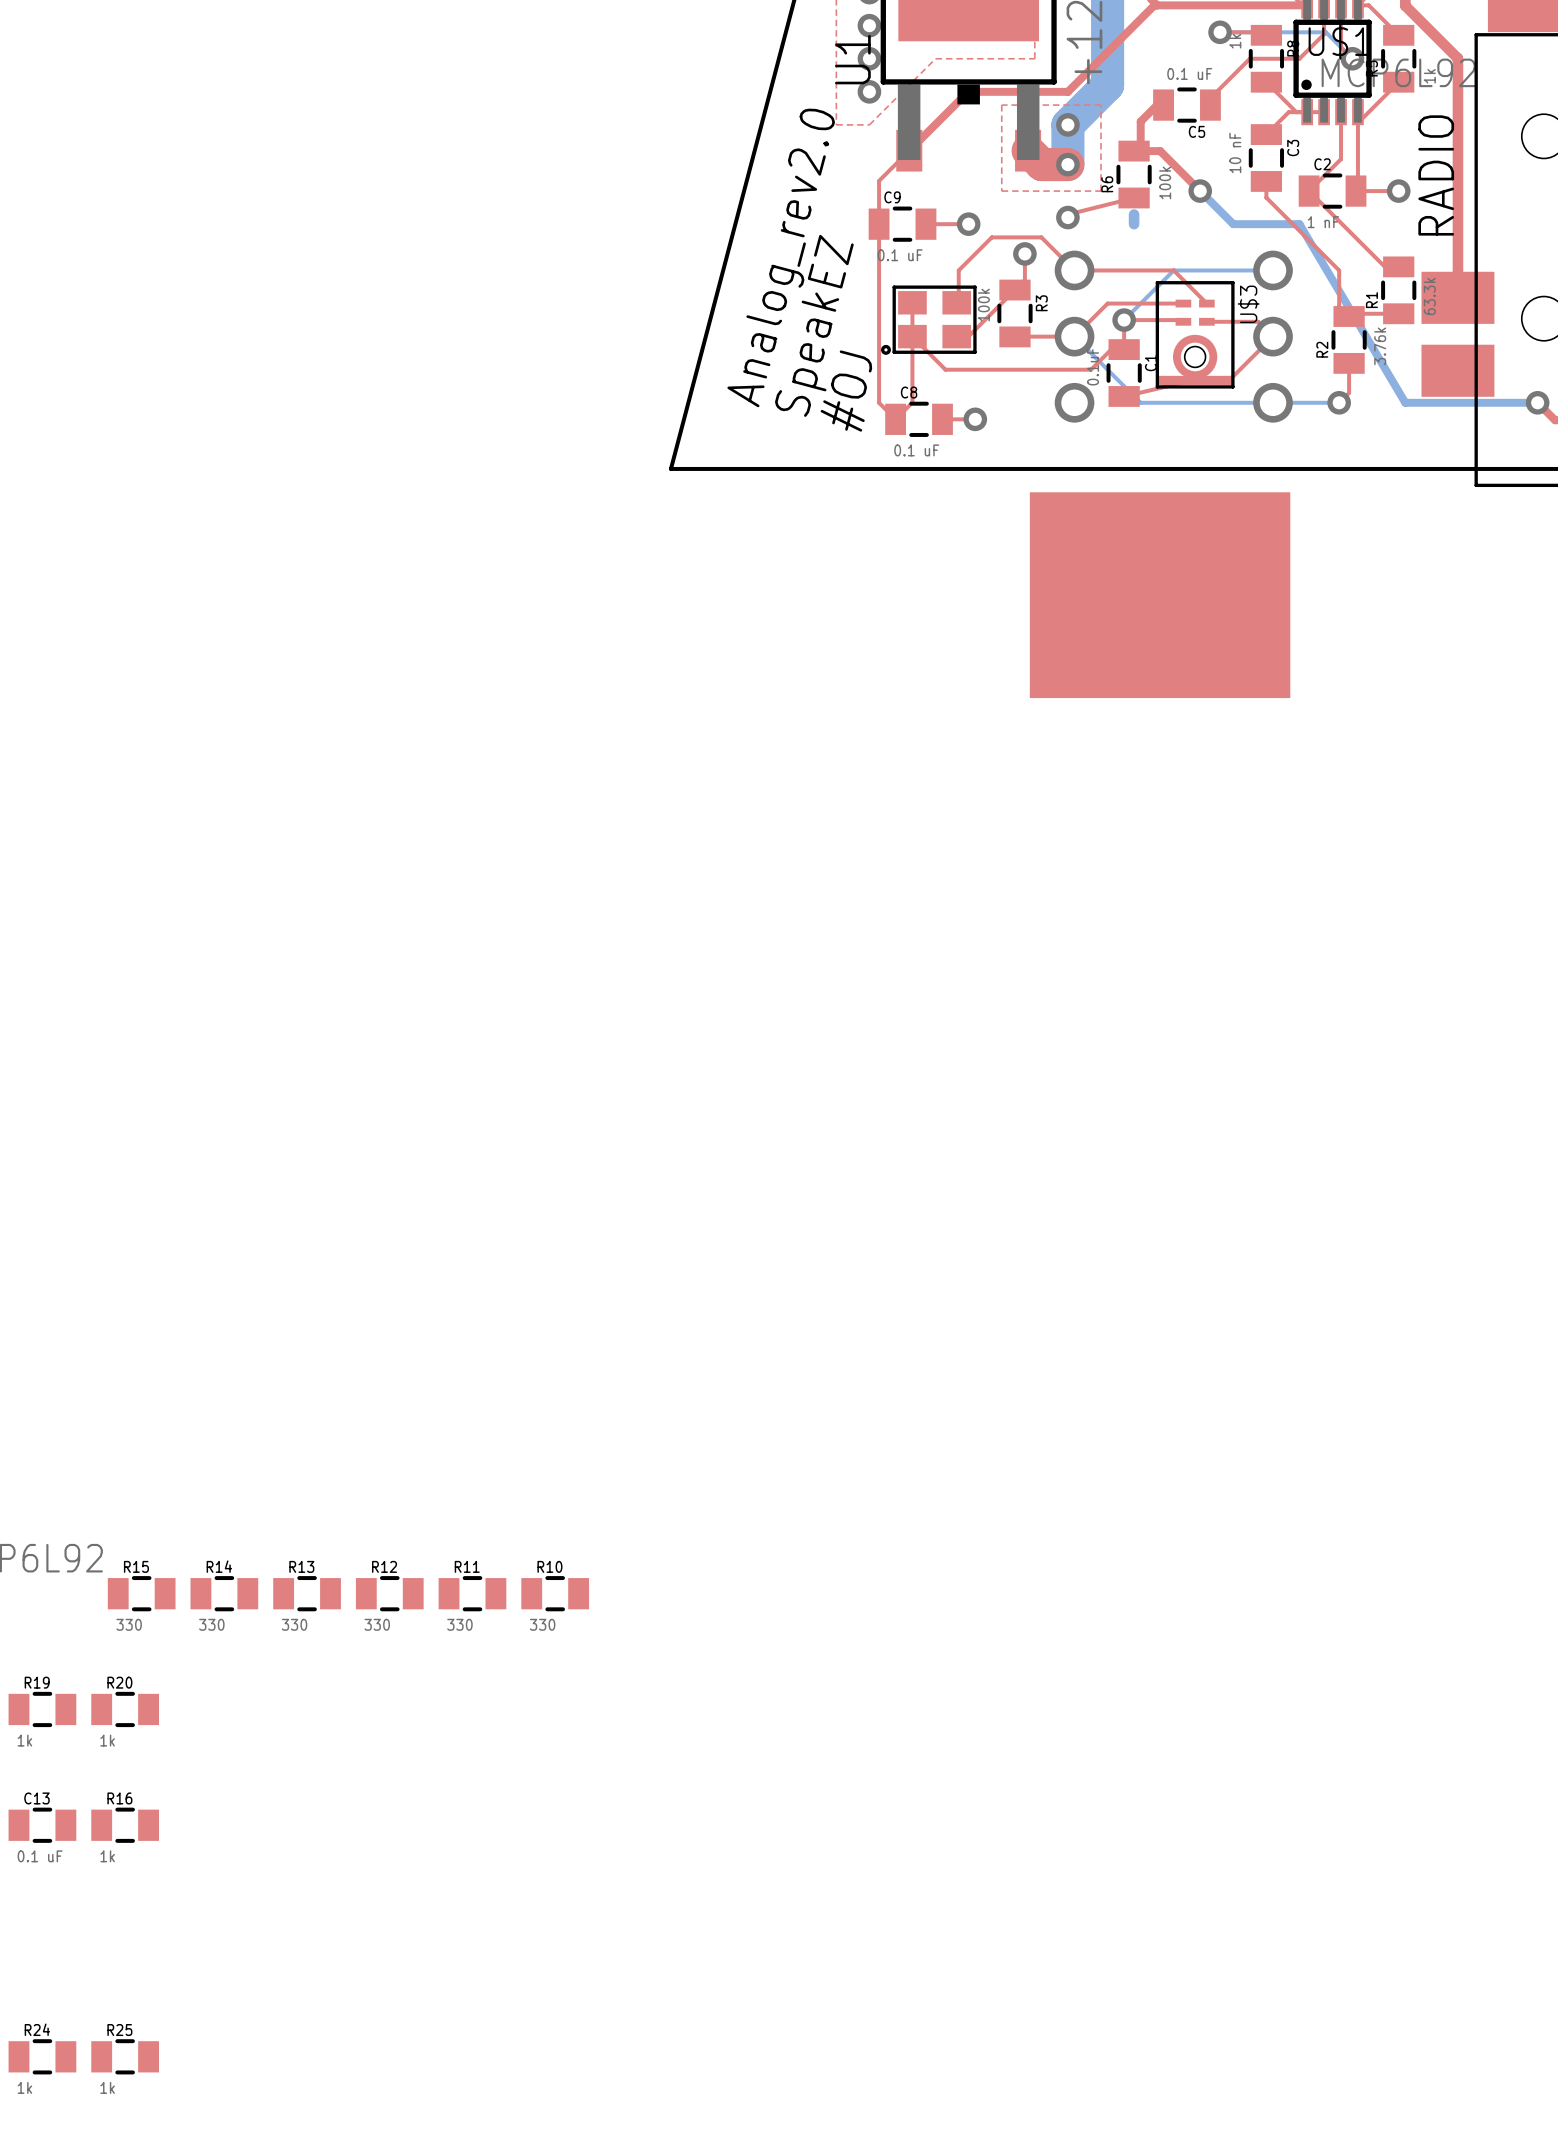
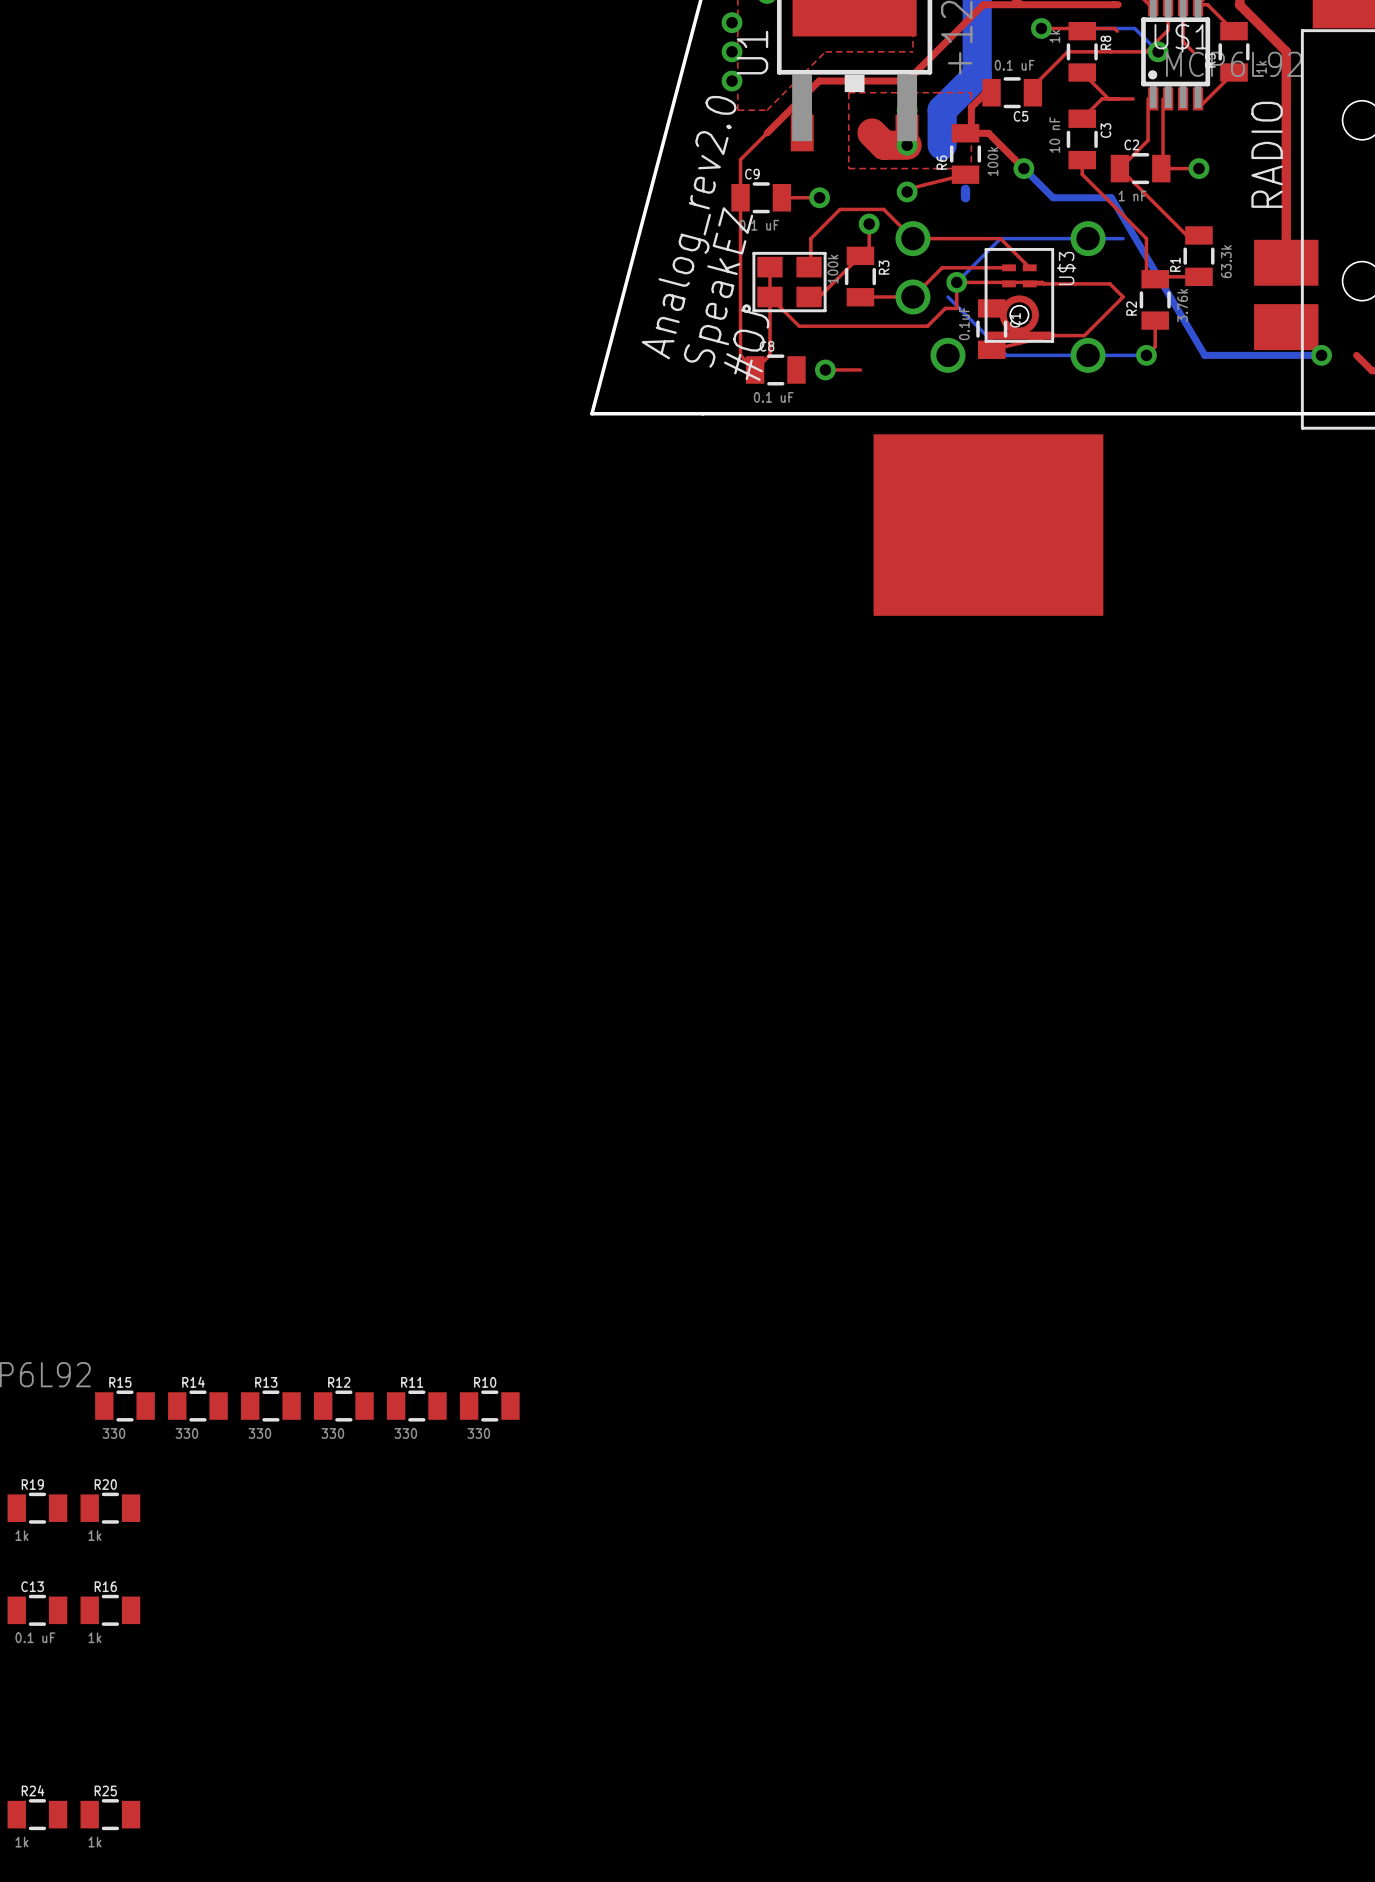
top track: (1154, 5) (1067, 91) (1028, 91) -> (1018, 4) (983, 4) (907, 81)
top track: (1267, 5) (1302, 5) -> none
via: none -> (732, 22)
via: (869, 25) -> none
via: none -> (1041, 28)
via: (1220, 32) -> none
bottom track: (1286, 32) (1325, 32) (1352, 58) -> (1134, 28) (1158, 51)
via: none -> (732, 51)
via: (869, 58) -> none
top track: (1249, 58) (1216, 91) (1210, 105) -> (1102, 51) (1067, 51) (1038, 81) (1032, 92)
R8 position: (1266, 58) -> (1082, 51)
via position: (1352, 58) -> (1158, 51)
top track: (1266, 82) (1296, 112) -> (1082, 72) (1108, 98)
via: none -> (732, 81)
via: (869, 91) -> none
top track: (968, 91) (879, 180) (879, 402) (895, 419) (912, 402) (912, 302) -> (854, 81) (819, 81) (740, 159) (740, 355) (755, 369) (769, 355) (769, 267)
top zone outline: (1001, 105) (1001, 191) -> (883, 92) (848, 92) (848, 168) (883, 168)
top track: (1163, 105) (1157, 105) (1140, 121) (1140, 144) (1134, 151) (1160, 151) (1200, 191) -> (991, 92) (985, 92) (971, 107) (971, 127) (965, 133) (988, 133) (1023, 168)
C5 position: (1187, 105) -> (1012, 92)
top track: (1324, 112) (1288, 112) (1266, 134) -> (1133, 98) (1102, 98) (1082, 118)
top track: (1341, 112) (1341, 159) (1309, 191) (1384, 266) (1398, 266) -> (1148, 98) (1148, 140) (1119, 168) (1186, 235) (1198, 235)
top track: (1357, 112) (1357, 189) (1356, 191) -> (1163, 98) (1163, 166) (1161, 168) (1196, 168)
via: (1067, 124) -> none
top track: (1028, 150) (1041, 164) (1067, 164) -> (871, 132) (884, 145) (907, 145)
C3 position: (1266, 158) -> (1082, 139)
via: none -> (907, 145)
via: (1067, 164) -> none
R6 position: (1134, 174) -> (965, 153)
top track: (1266, 181) (1266, 197) (1339, 270) (1339, 306) (1349, 316) (1351, 313) -> (1082, 160) (1082, 174) (1146, 238) (1146, 270) (1155, 279) (1157, 276) (1192, 276)
bottom track: (1200, 191) (1233, 224) -> (1023, 168) (1053, 197) (1088, 197)
via position: (1200, 191) -> (1023, 168)
C2 position: (1332, 191) -> (1140, 168)
top track: (1359, 191) (1398, 191) -> (1041, 28) (1076, 28)
via position: (1398, 191) -> (1198, 168)
top track: (1134, 197) (1067, 214) (1067, 217) -> (965, 174) (907, 189) (907, 191)
bottom track: (1134, 214) (1134, 224) -> (965, 189) (965, 197)
via: none -> (907, 191)
via: (1067, 217) -> none
C9 position: (902, 224) -> (761, 197)
top track: (928, 224) (968, 224) -> (781, 197) (816, 197)
via: none -> (819, 197)
via: (968, 224) -> none
bottom track: (1259, 224) (1299, 224) (1405, 402) -> (1111, 197) (1204, 355) (1239, 355)
top track: (991, 237) (958, 270) (958, 300) (956, 302) -> (875, 209) (840, 209) (810, 238) (810, 265) (809, 267)
top track: (1001, 237) (1041, 237) (1074, 270) -> (883, 209) (912, 238) (948, 238)
via size: [1013, 242, 1037, 266] -> [895, 221, 931, 257]
via: none -> (869, 224)
top track: (1024, 253) (1024, 280) (968, 336) (956, 336) -> (869, 224) (869, 247) (819, 297) (809, 297)
via: (1074, 270) -> none
top track: (1134, 270) (1173, 270) (1206, 303) -> (1000, 238) (1029, 267)
bottom track: (1173, 270) (1124, 320) -> (1035, 238) (1000, 238) (956, 282)
via: none -> (1088, 238)
via: (1273, 270) -> none
R1 position: (1398, 290) -> (1198, 256)
top track: (1107, 303) (1074, 336) (1034, 336) -> (977, 267) (942, 267) (912, 297)
top track: (1143, 303) (1183, 303) -> (1029, 283) (1064, 283)
R3 position: (1014, 313) -> (860, 276)
top track: (1359, 313) (1398, 313) -> (860, 297) (895, 297)
part position: (928, 320) -> (784, 282)
top track: (1124, 320) (1124, 349) (1111, 349) (1091, 369) (1051, 369) -> (991, 282) (956, 282) (956, 308) (945, 308) (927, 326)
via position: (1124, 320) -> (956, 282)
U$3 position: (1195, 334) -> (1019, 295)
top track: (912, 336) (945, 369) -> (769, 297) (799, 326) (834, 326)
via: none -> (912, 297)
via: (1074, 336) -> none
via: (1273, 336) -> none
R2 position: (1349, 339) -> (1155, 299)
top track: (1349, 363) (1349, 392) (1339, 402) -> (1155, 320) (1155, 346) (1146, 355)
via: none -> (1088, 355)
via: (1273, 402) -> none
bottom track: (1299, 402) (1339, 402) -> none
via position: (1339, 402) -> (1146, 355)
bottom track: (1497, 402) (1537, 402) -> none
via position: (1537, 402) -> (1321, 355)
C8 position: (919, 419) -> (775, 369)
via position: (975, 419) -> (825, 369)
drawing position: (1160, 595) -> (988, 525)

